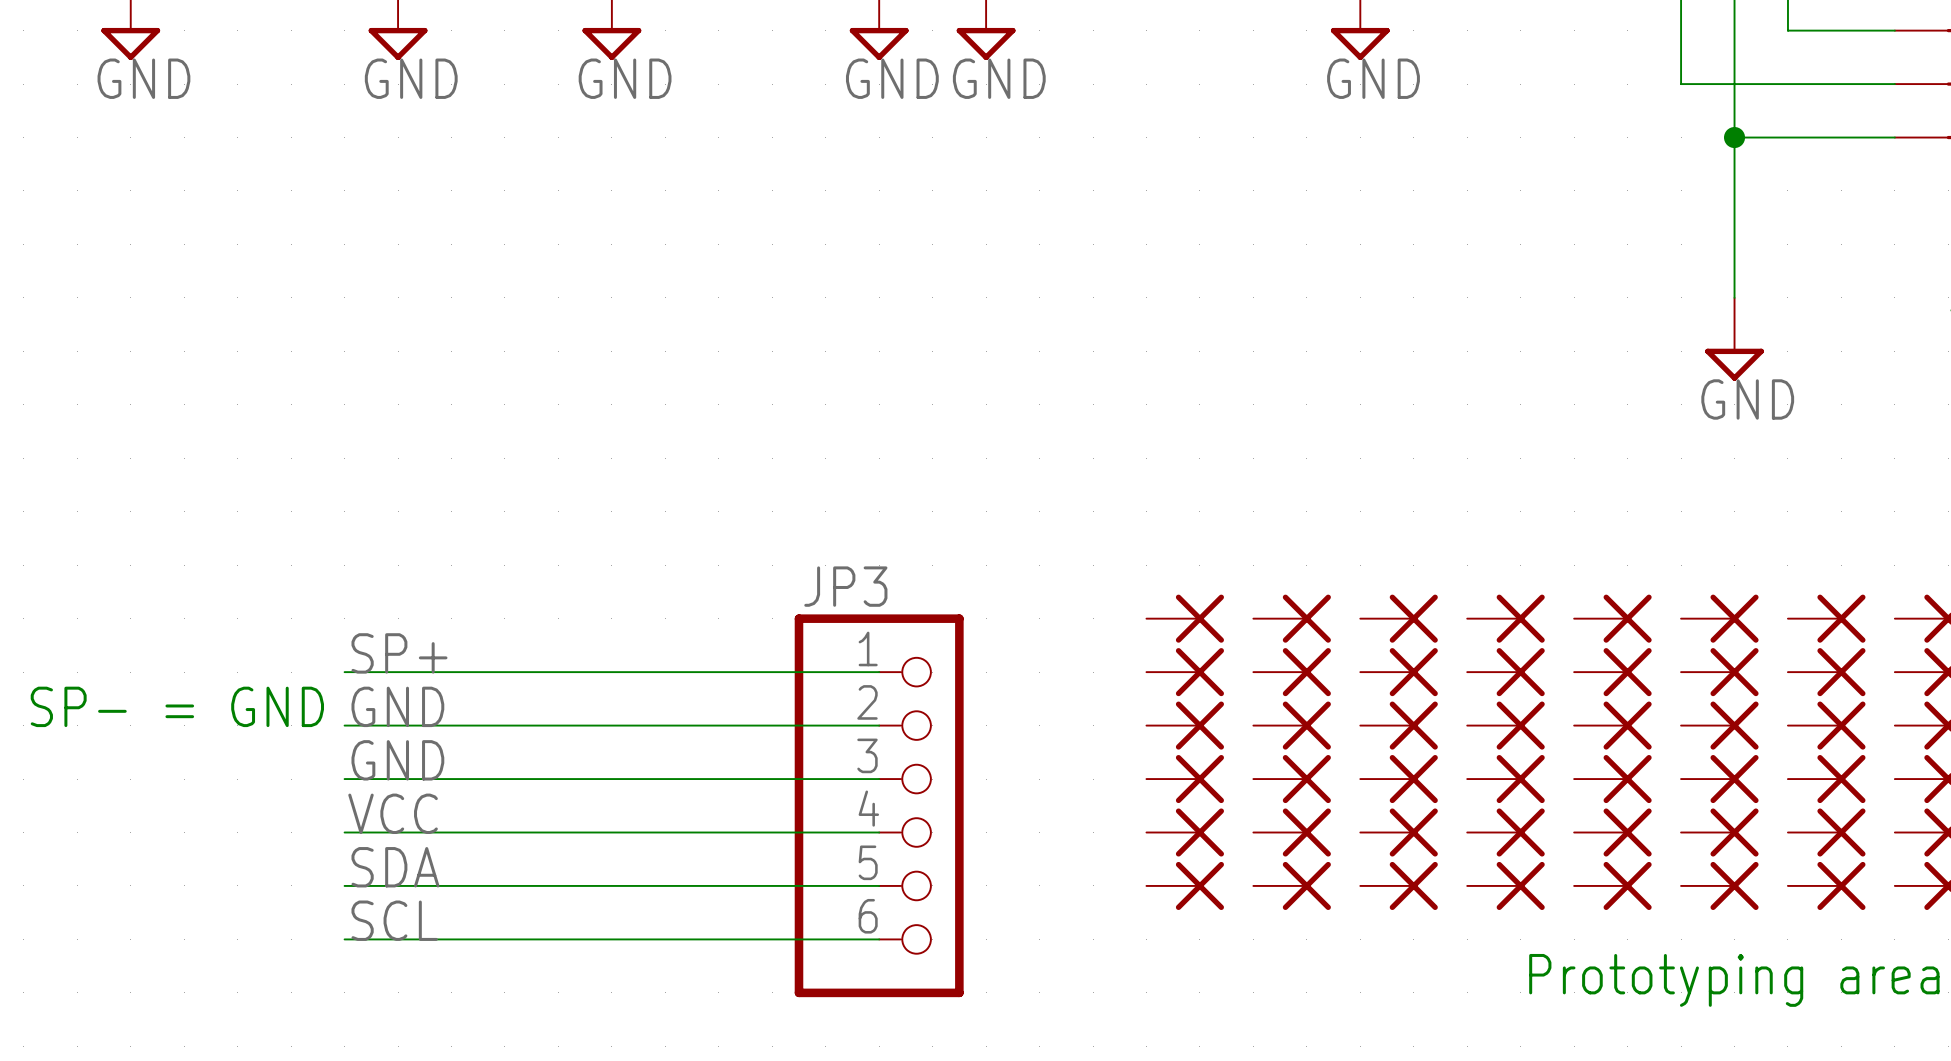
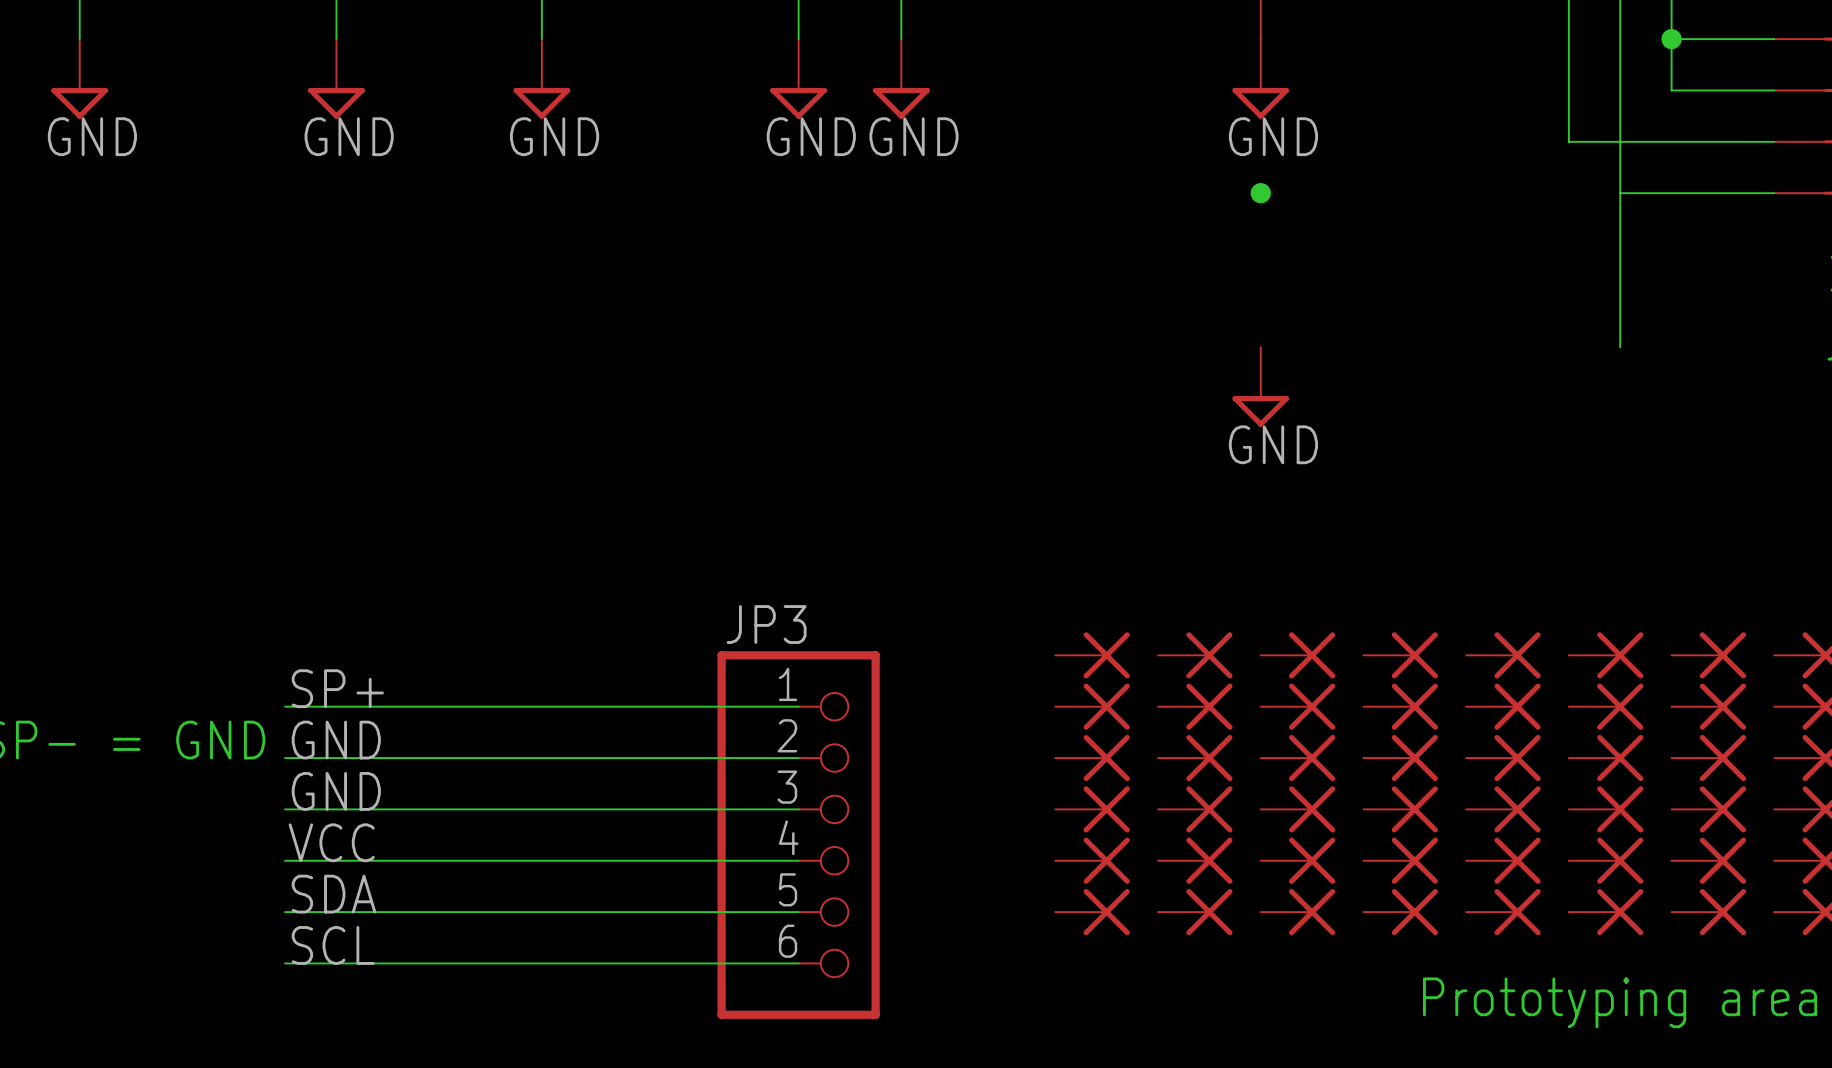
junction: none -> (1260, 193)
junction: (1734, 137) -> none
power symbol position: GND (1734, 339) -> GND (1260, 387)

